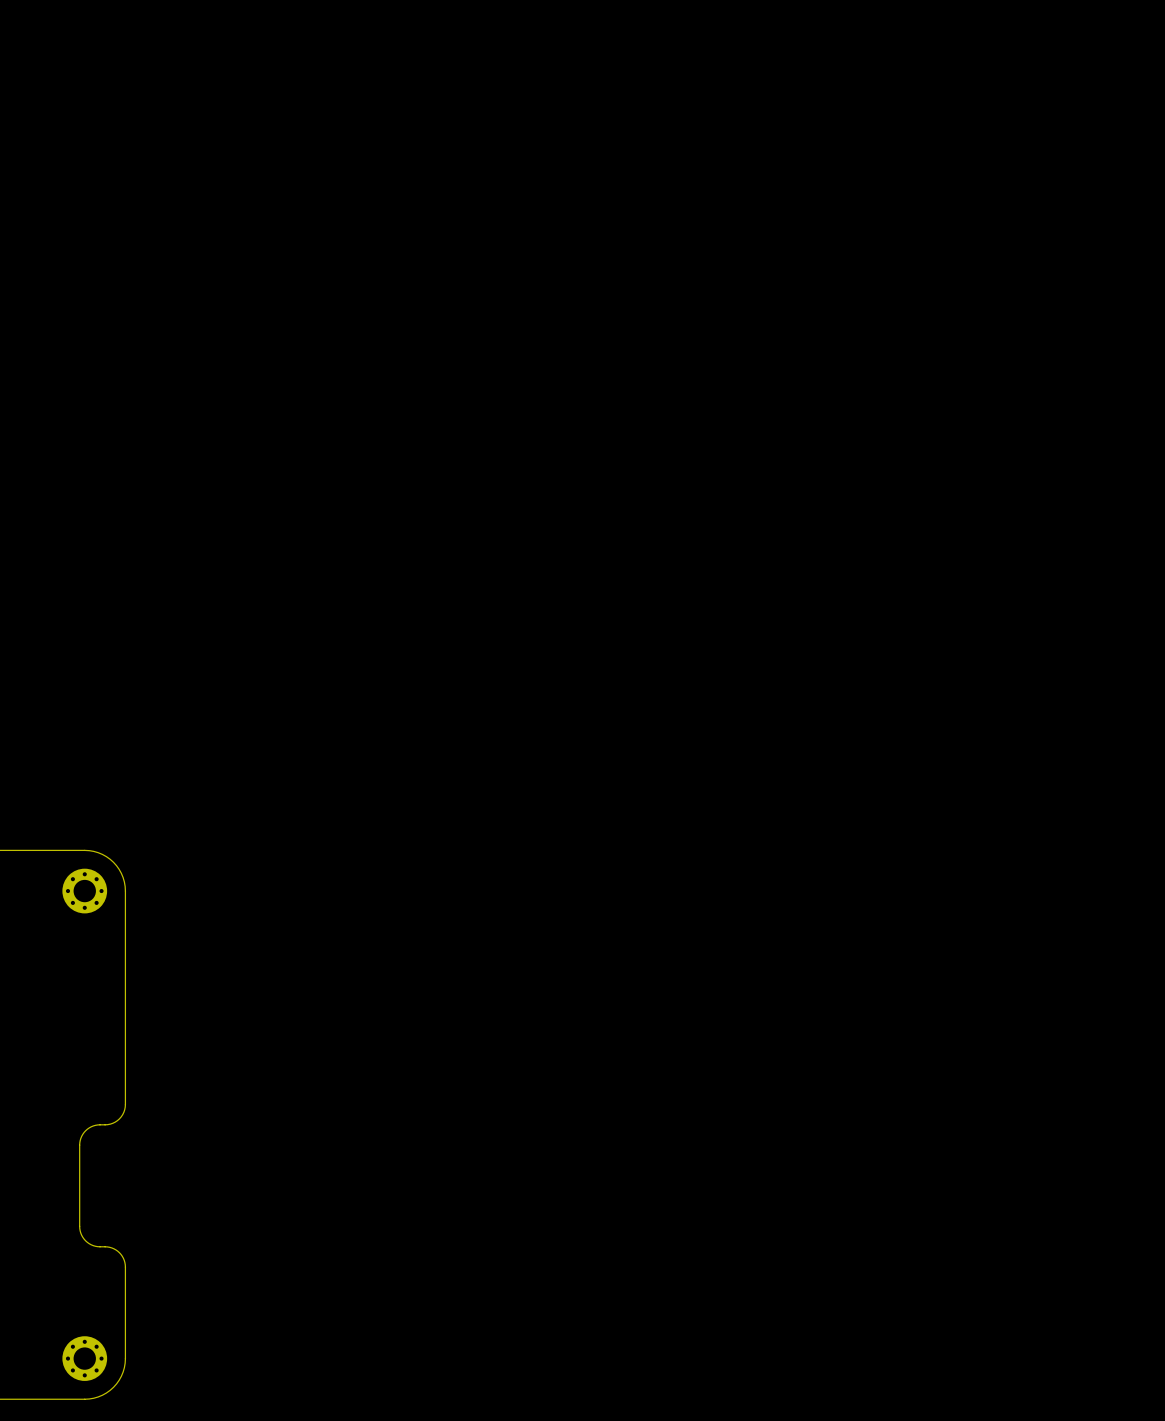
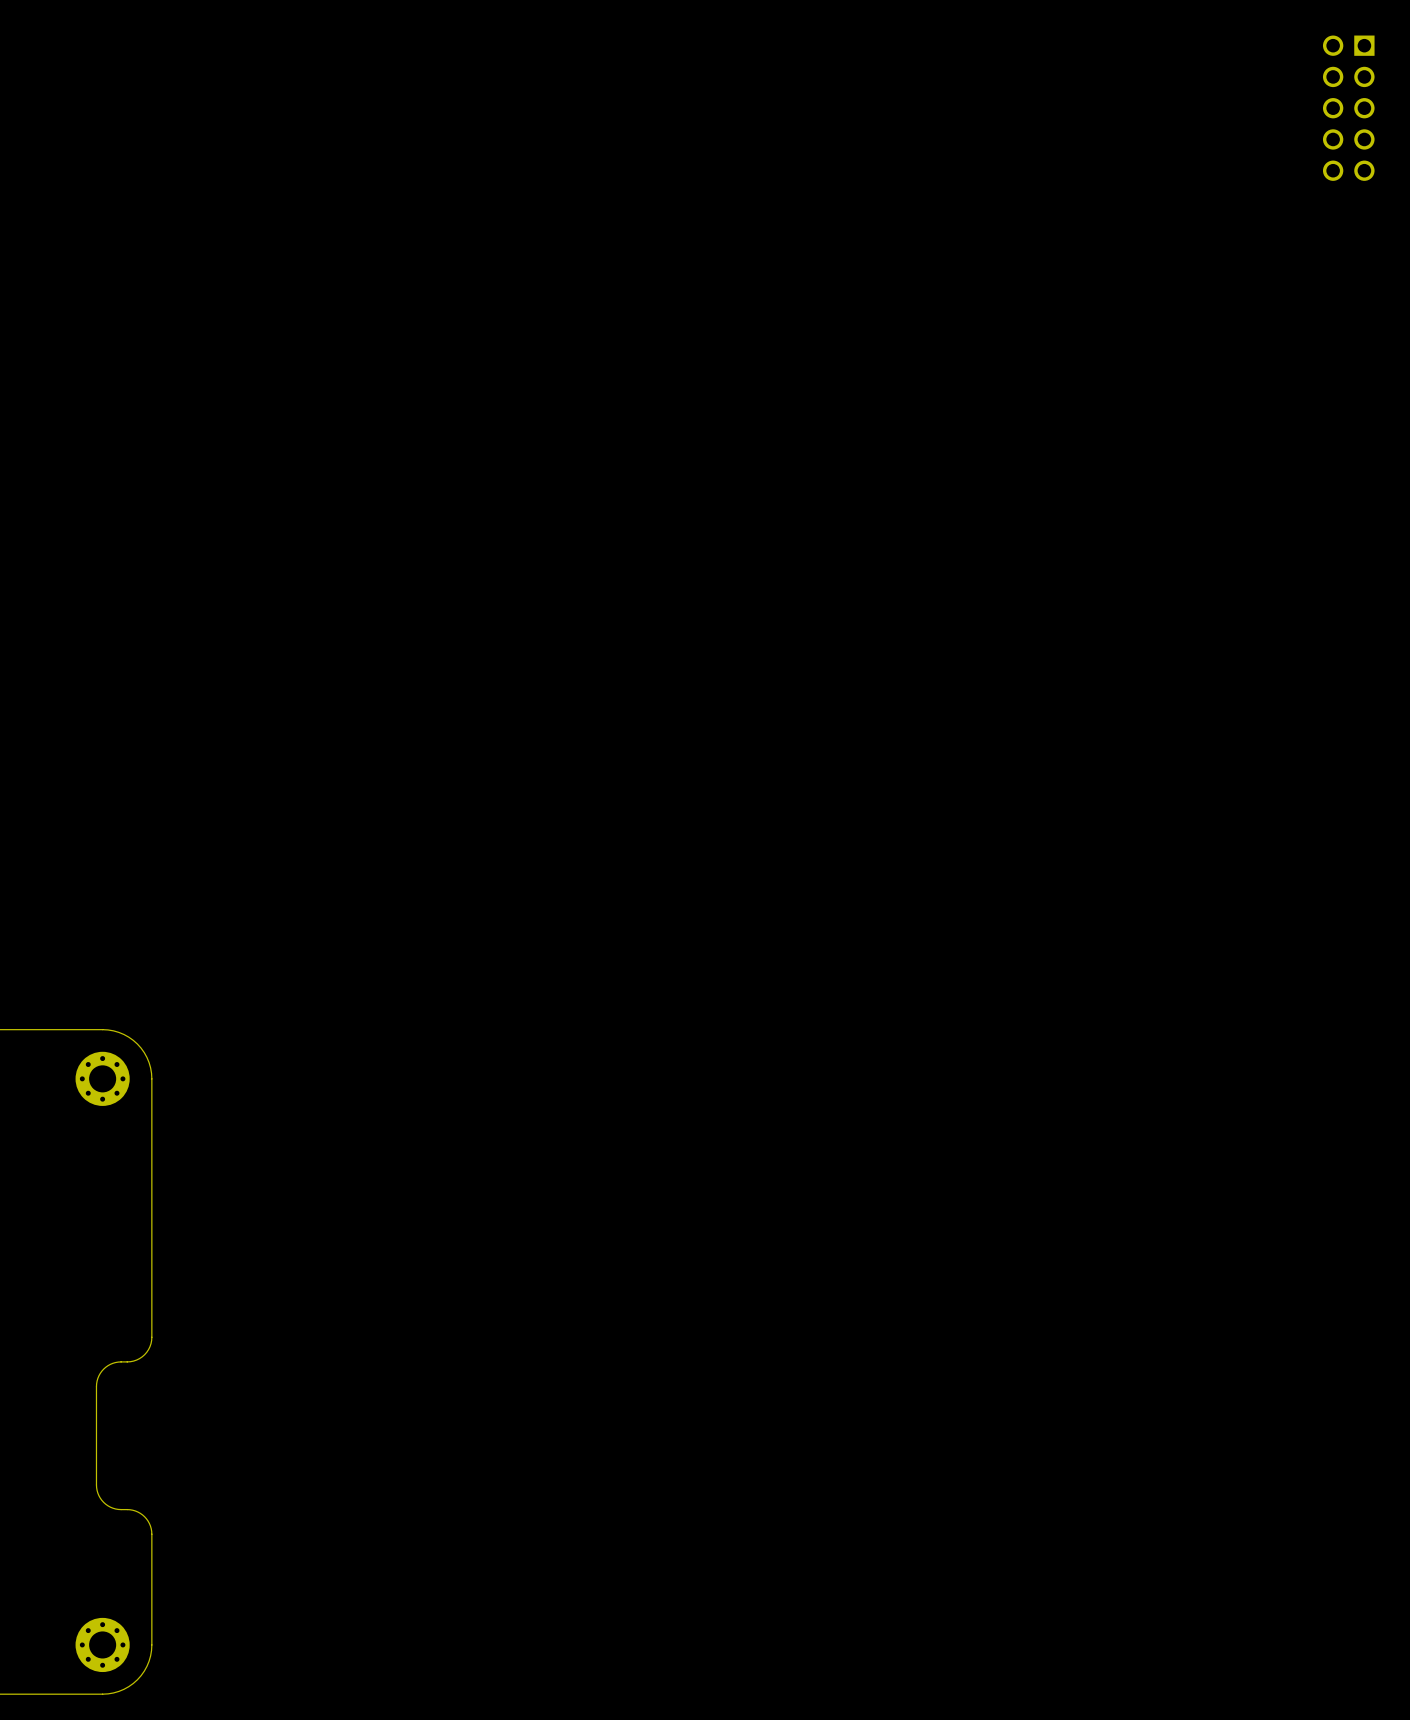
part: none -> (1348, 108)

